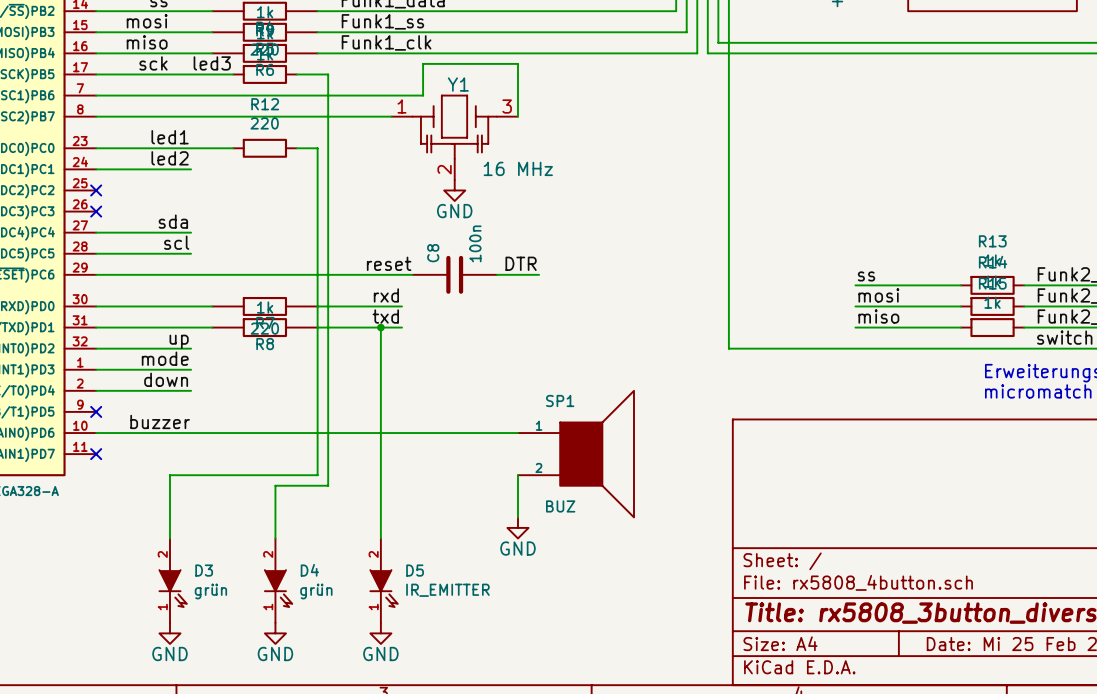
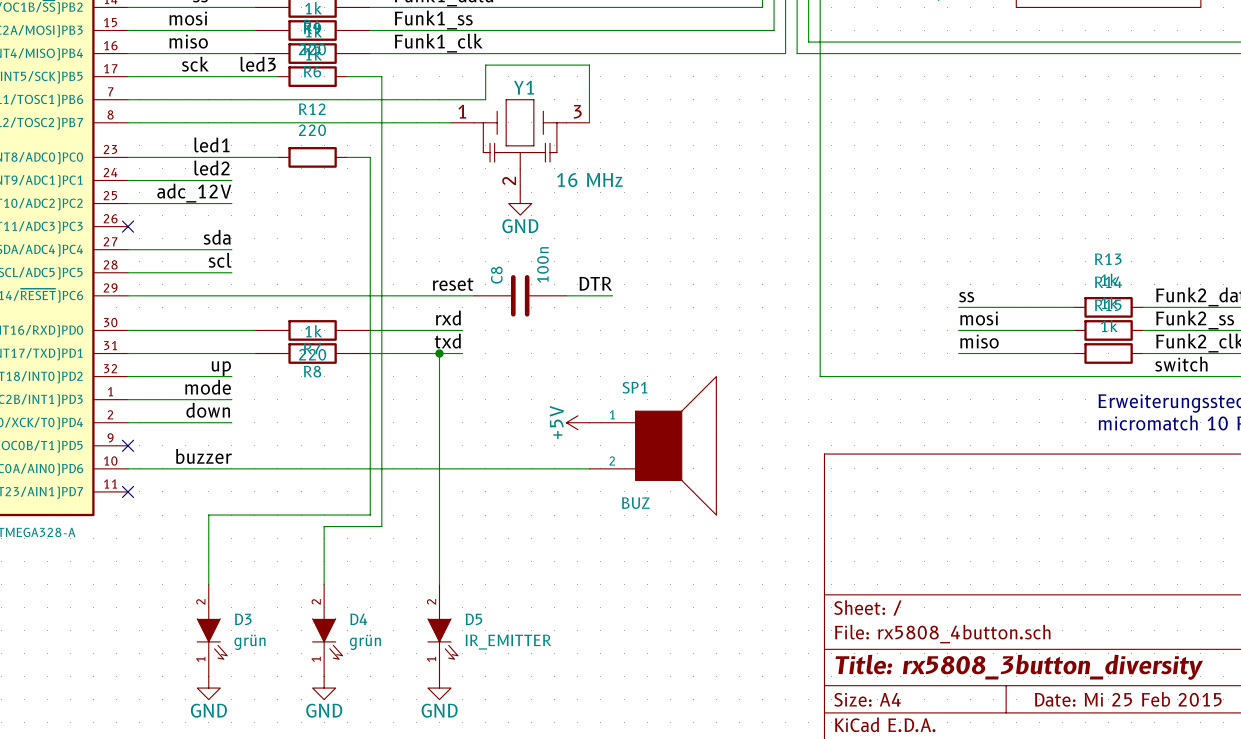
label: none -> adc_12V (194, 193)
wire: none -> (128, 203) (231, 203)
no-connect mark: (96, 190) -> none
power symbol: none -> +5V (577, 422)
SP1 position: (575, 454) -> (652, 445)
wire: (517, 475) (517, 517) -> none
power symbol: GND (517, 527) -> none

